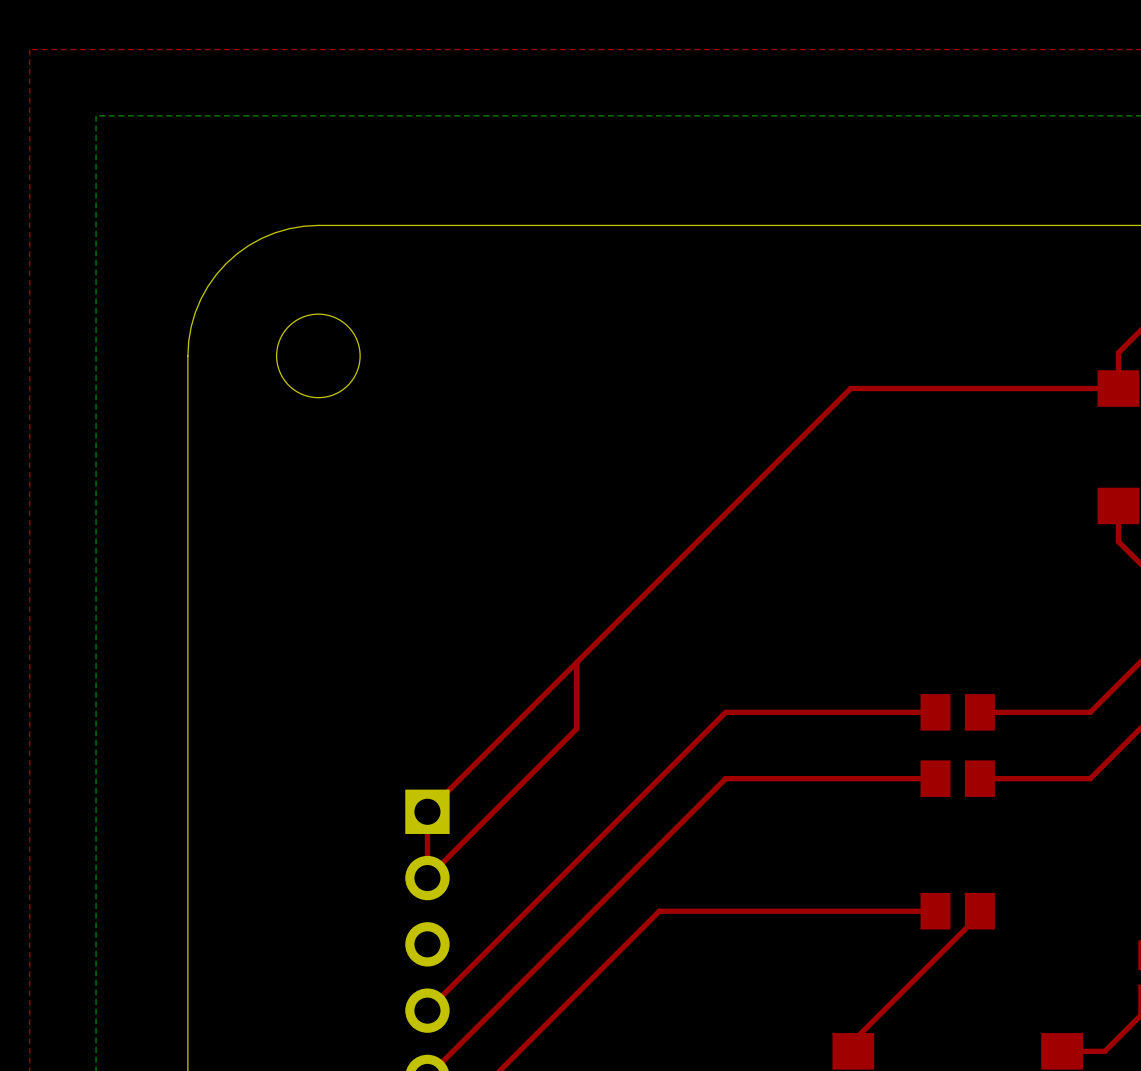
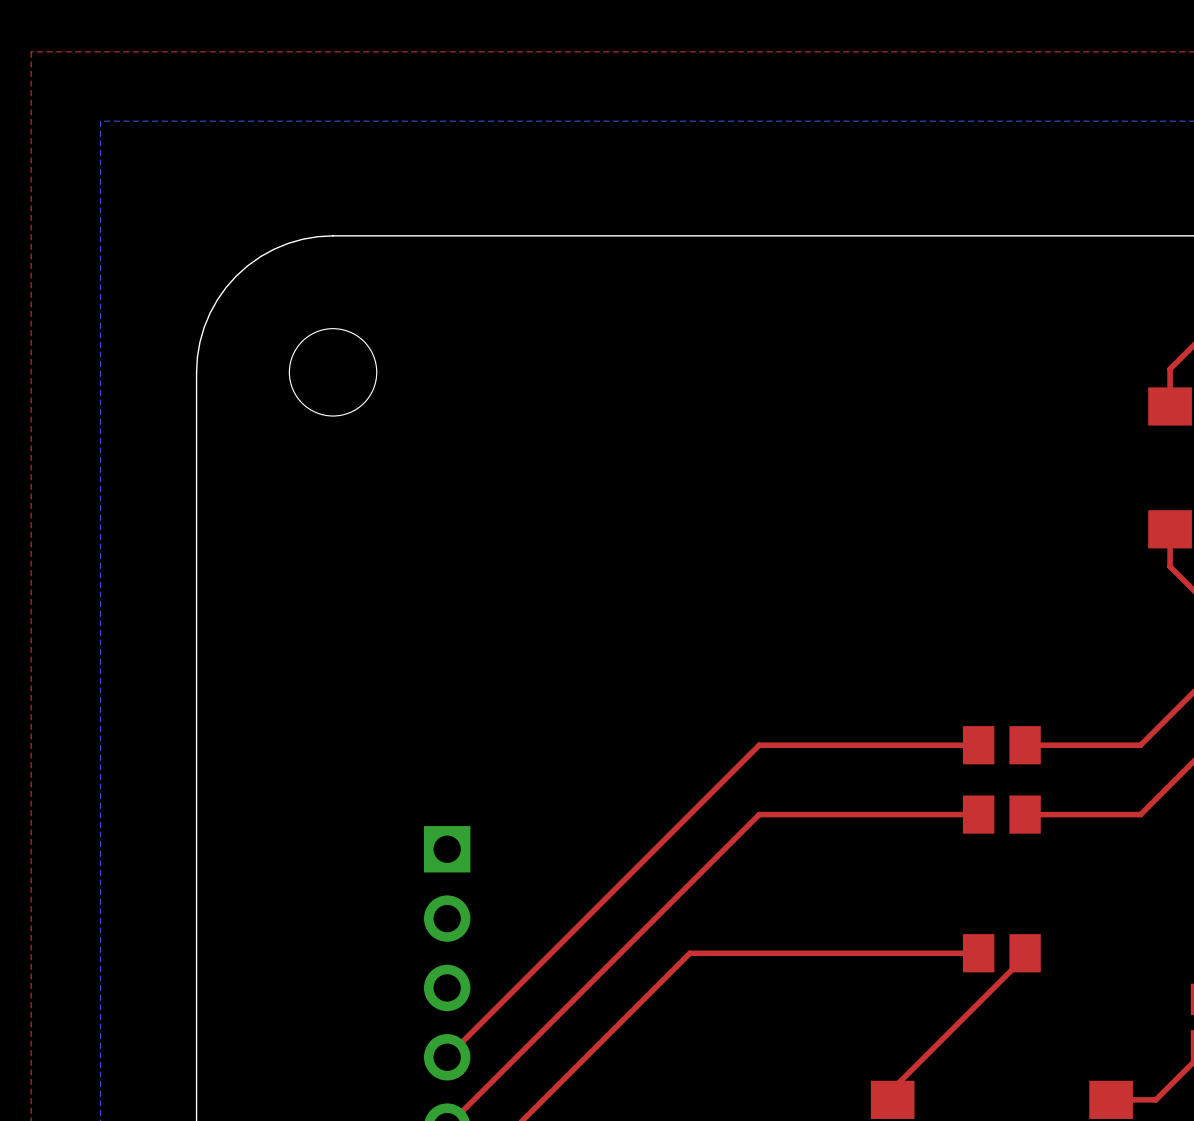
top track: (1118, 388) (850, 388) (427, 811) (427, 878) (576, 728) (576, 662) -> none

